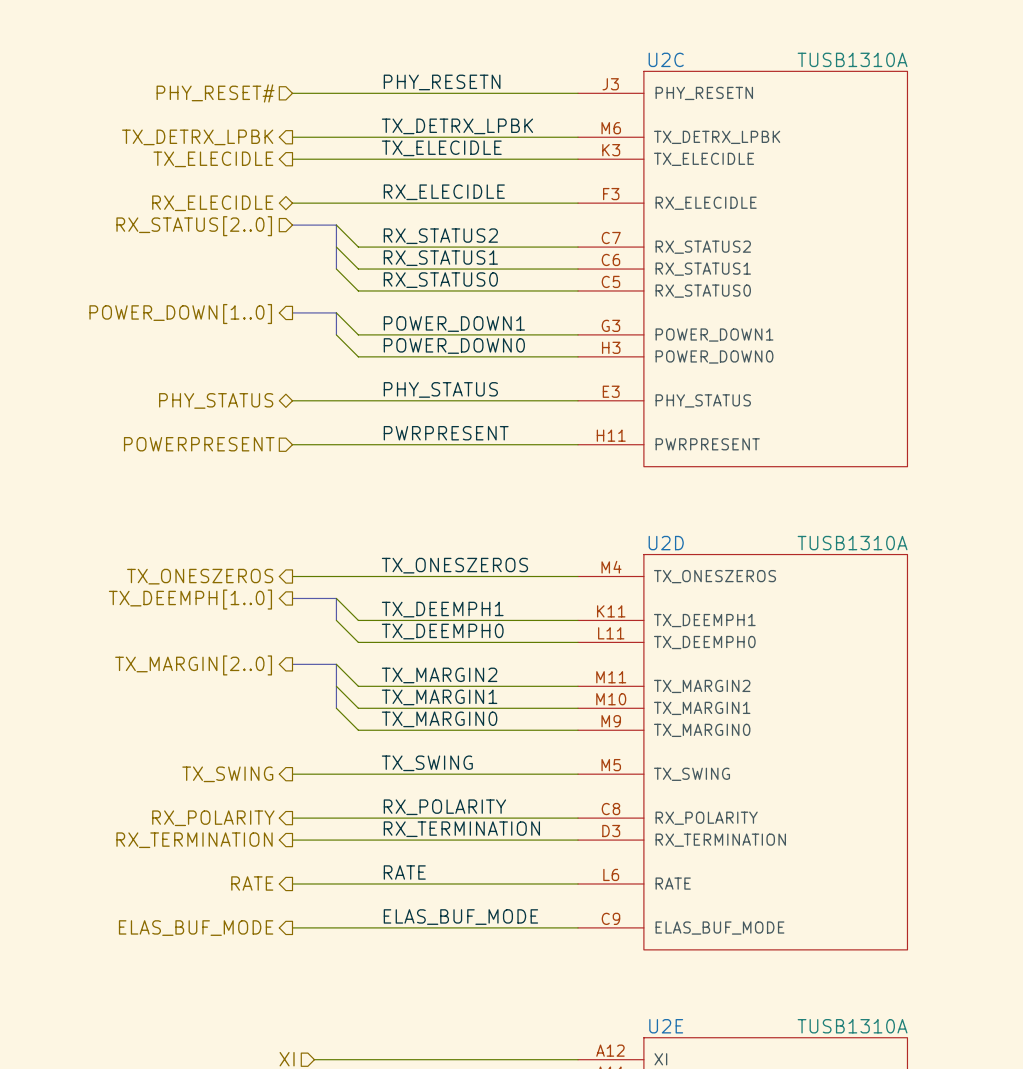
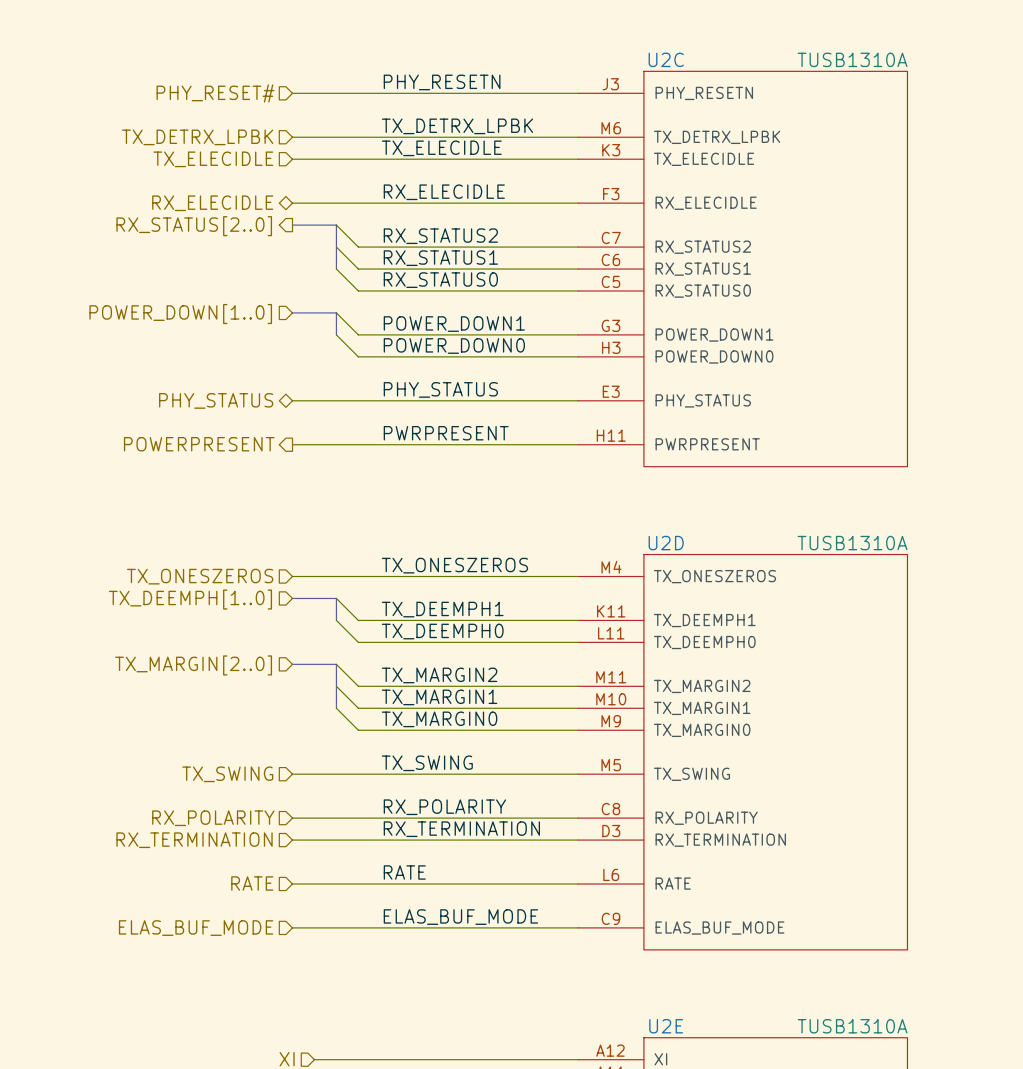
hierarchical label shape: output (197, 137) -> input (197, 137)
hierarchical label shape: output (213, 159) -> input (213, 159)
hierarchical label shape: input (194, 226) -> output (194, 226)
hierarchical label shape: output (180, 314) -> input (180, 314)
hierarchical label shape: input (199, 444) -> output (199, 444)
hierarchical label shape: output (200, 576) -> input (200, 576)
hierarchical label shape: output (190, 599) -> input (190, 599)
hierarchical label shape: output (193, 665) -> input (193, 665)
hierarchical label shape: output (227, 774) -> input (227, 774)
hierarchical label shape: output (213, 818) -> input (213, 818)
hierarchical label shape: output (194, 840) -> input (194, 840)
hierarchical label shape: output (252, 883) -> input (252, 883)
hierarchical label shape: output (196, 928) -> input (196, 928)

